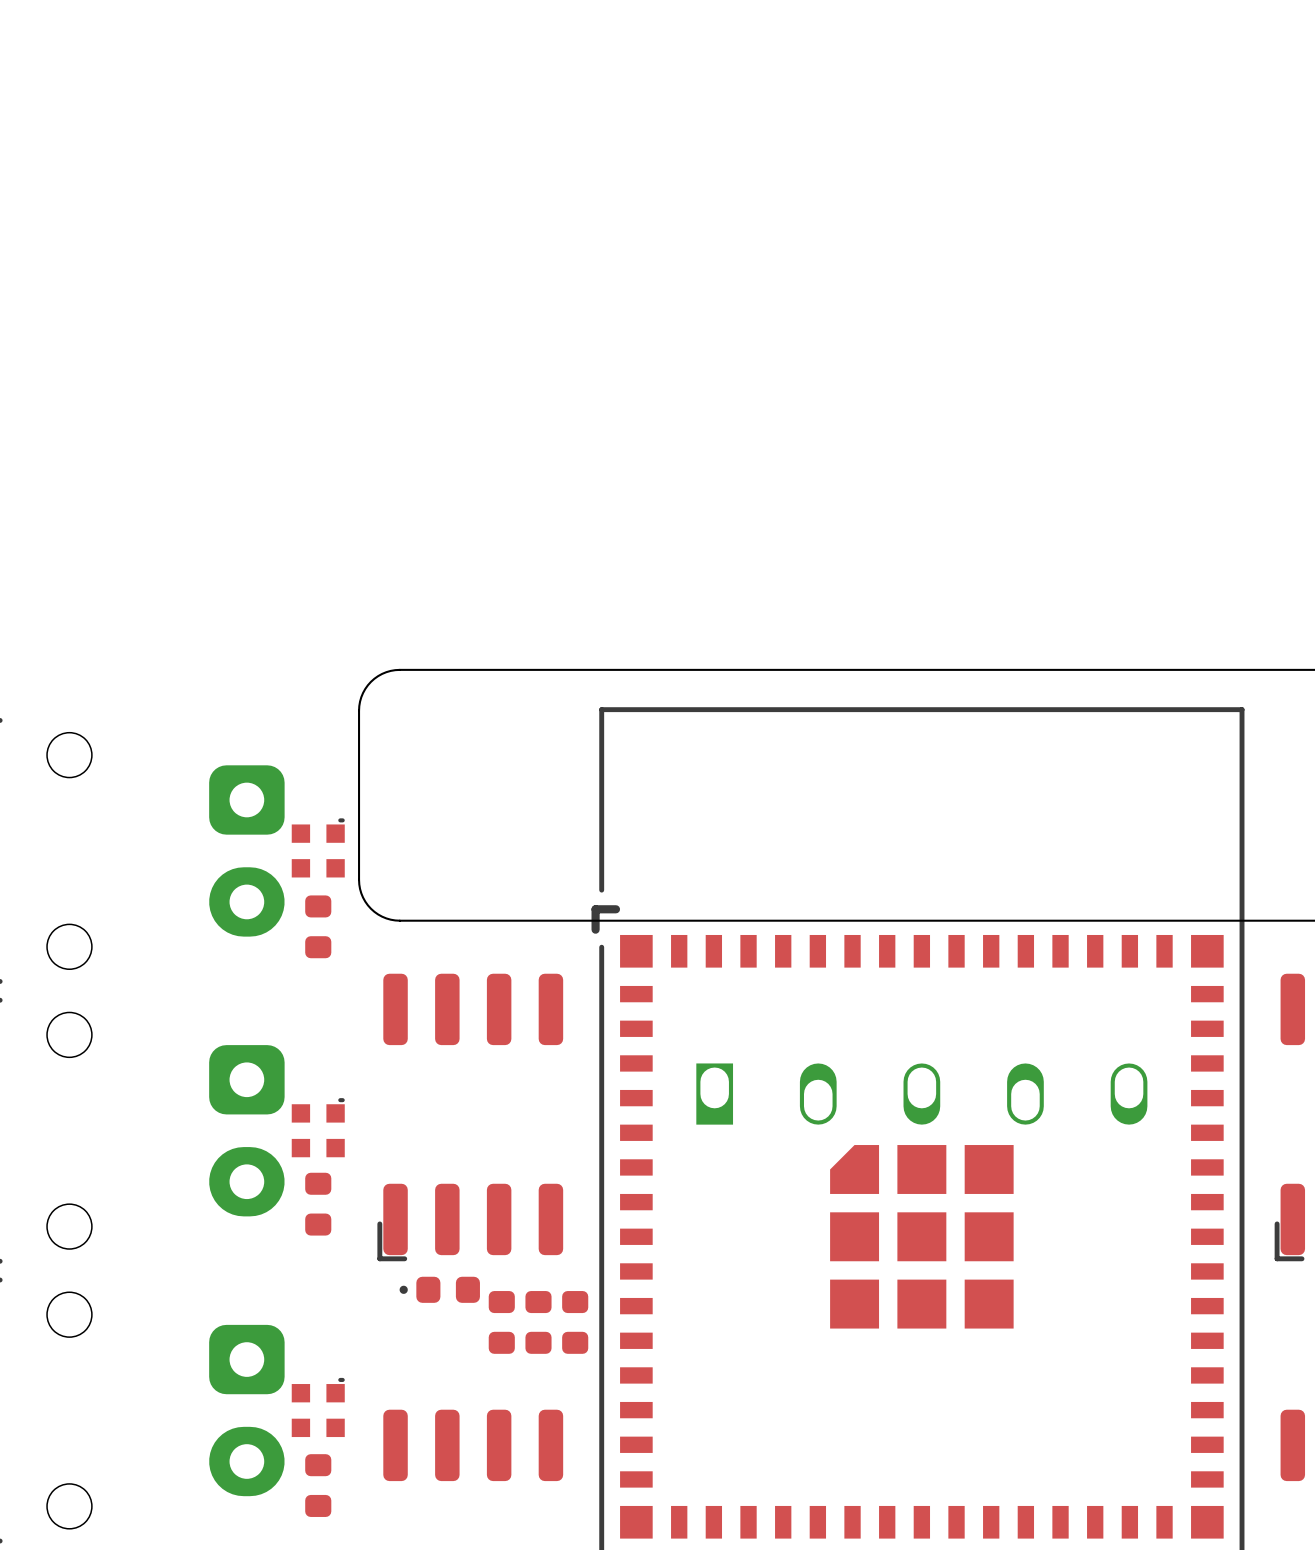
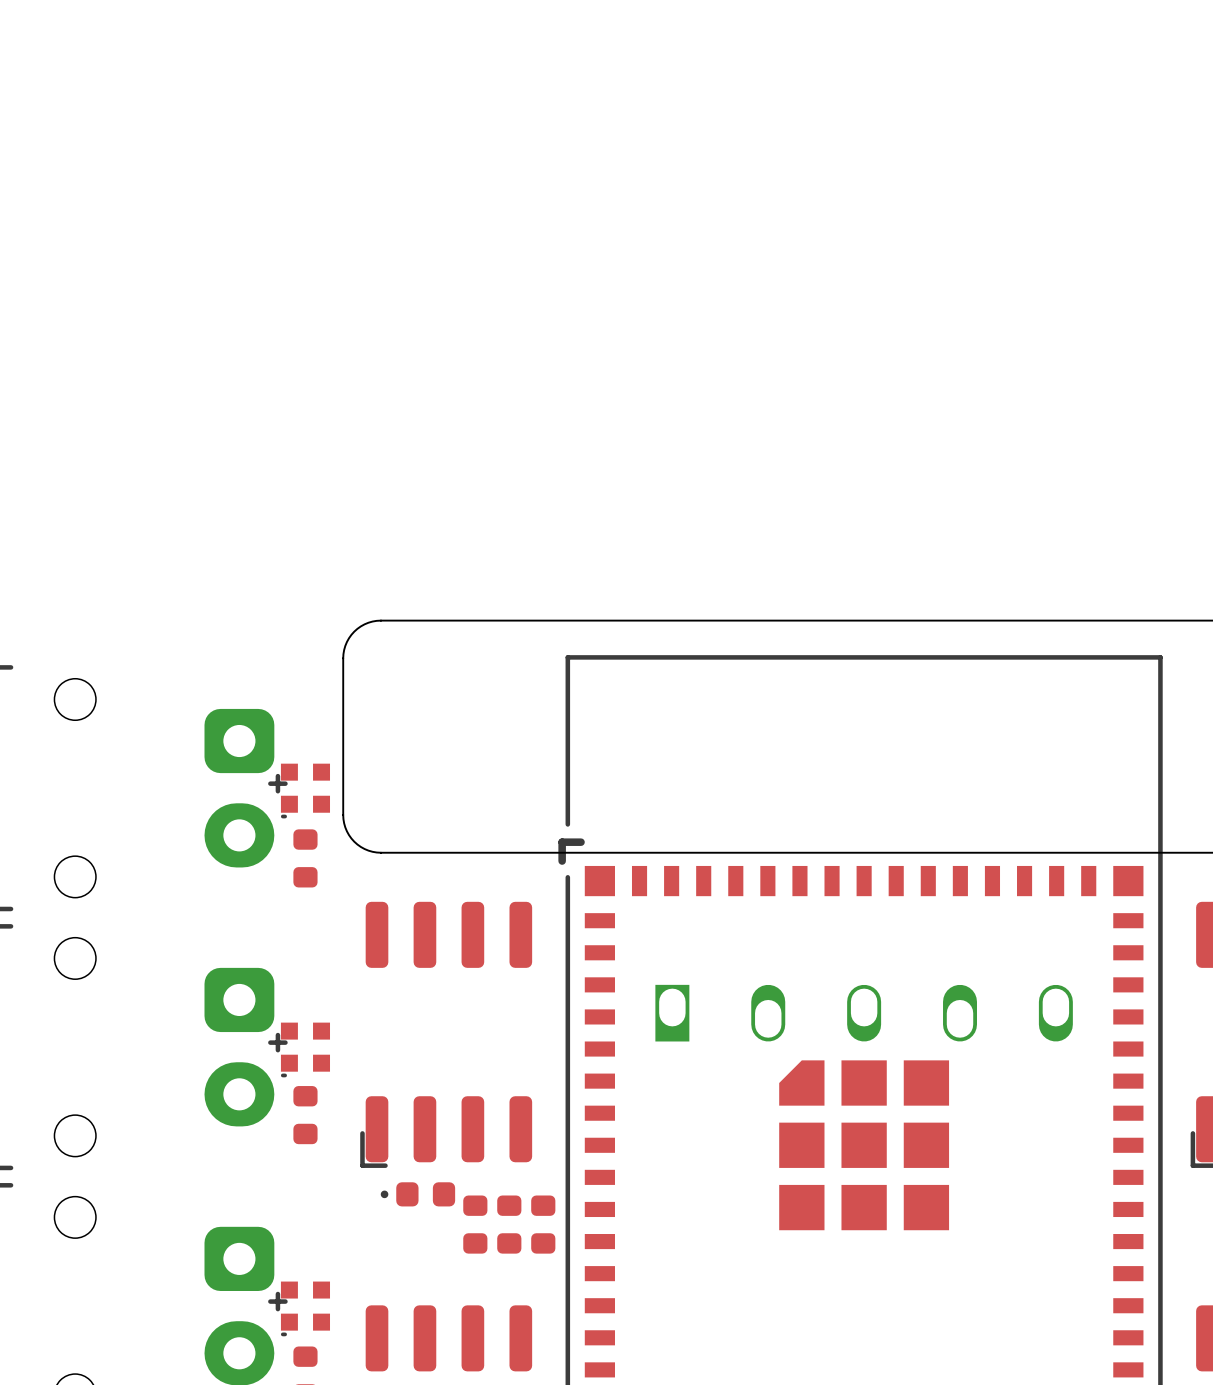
part footprint: [291, 818, 345, 878] -> [268, 763, 331, 819]
part footprint: [291, 1098, 345, 1158] -> [268, 1022, 331, 1078]
part footprint: [291, 1377, 345, 1438] -> [268, 1281, 331, 1337]

